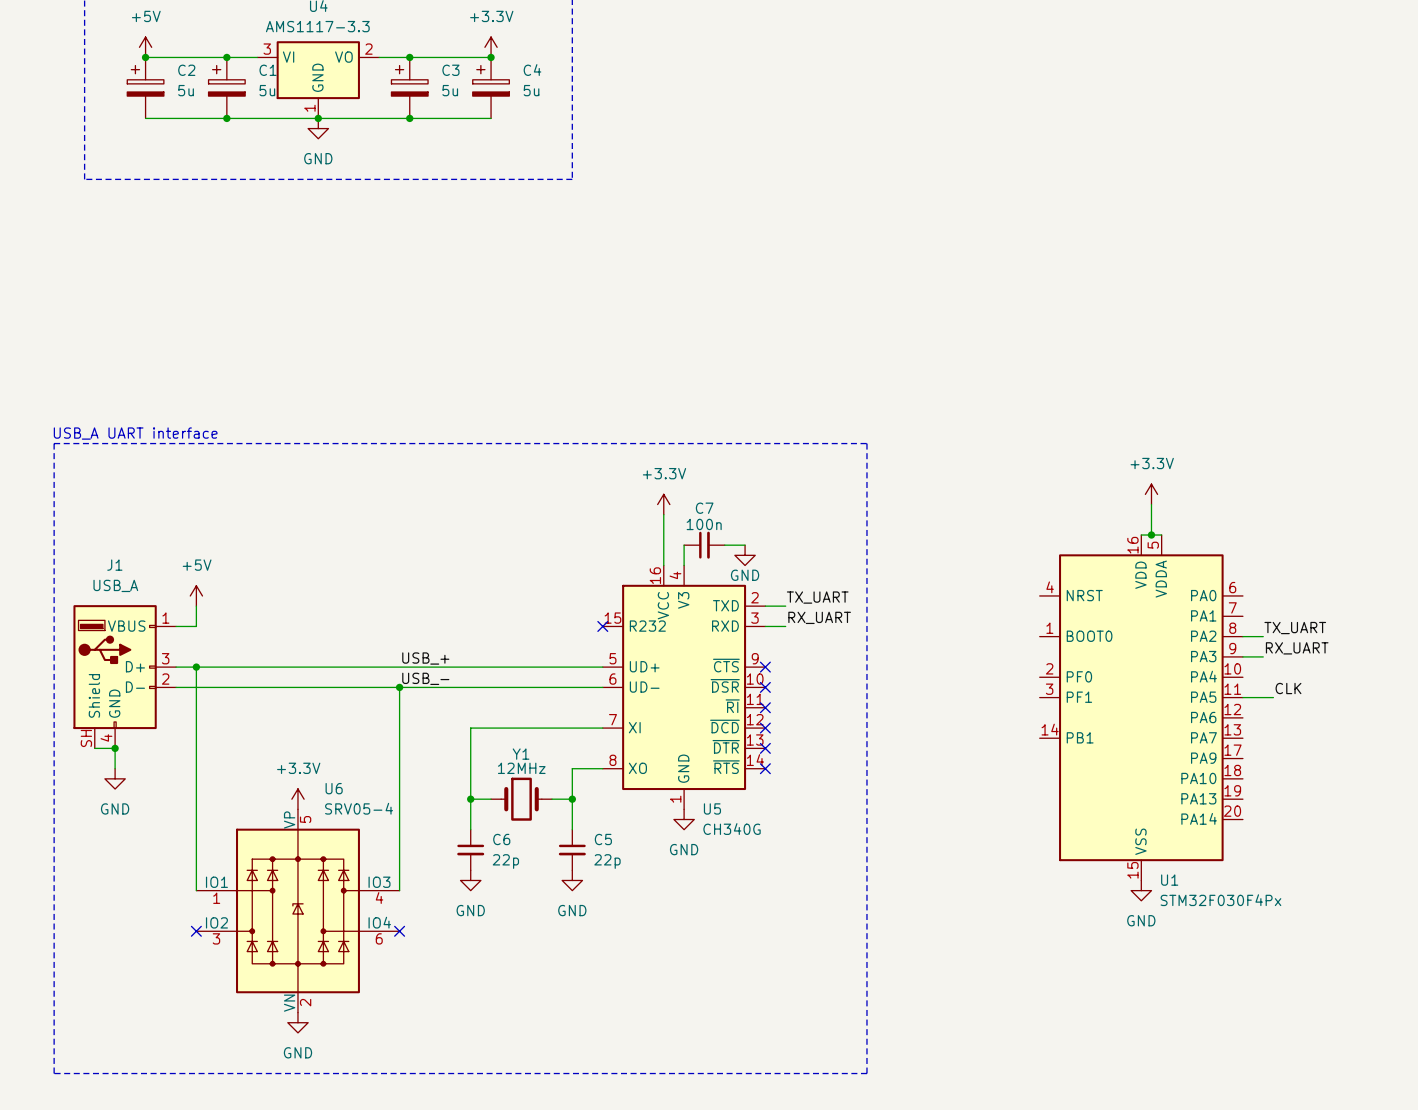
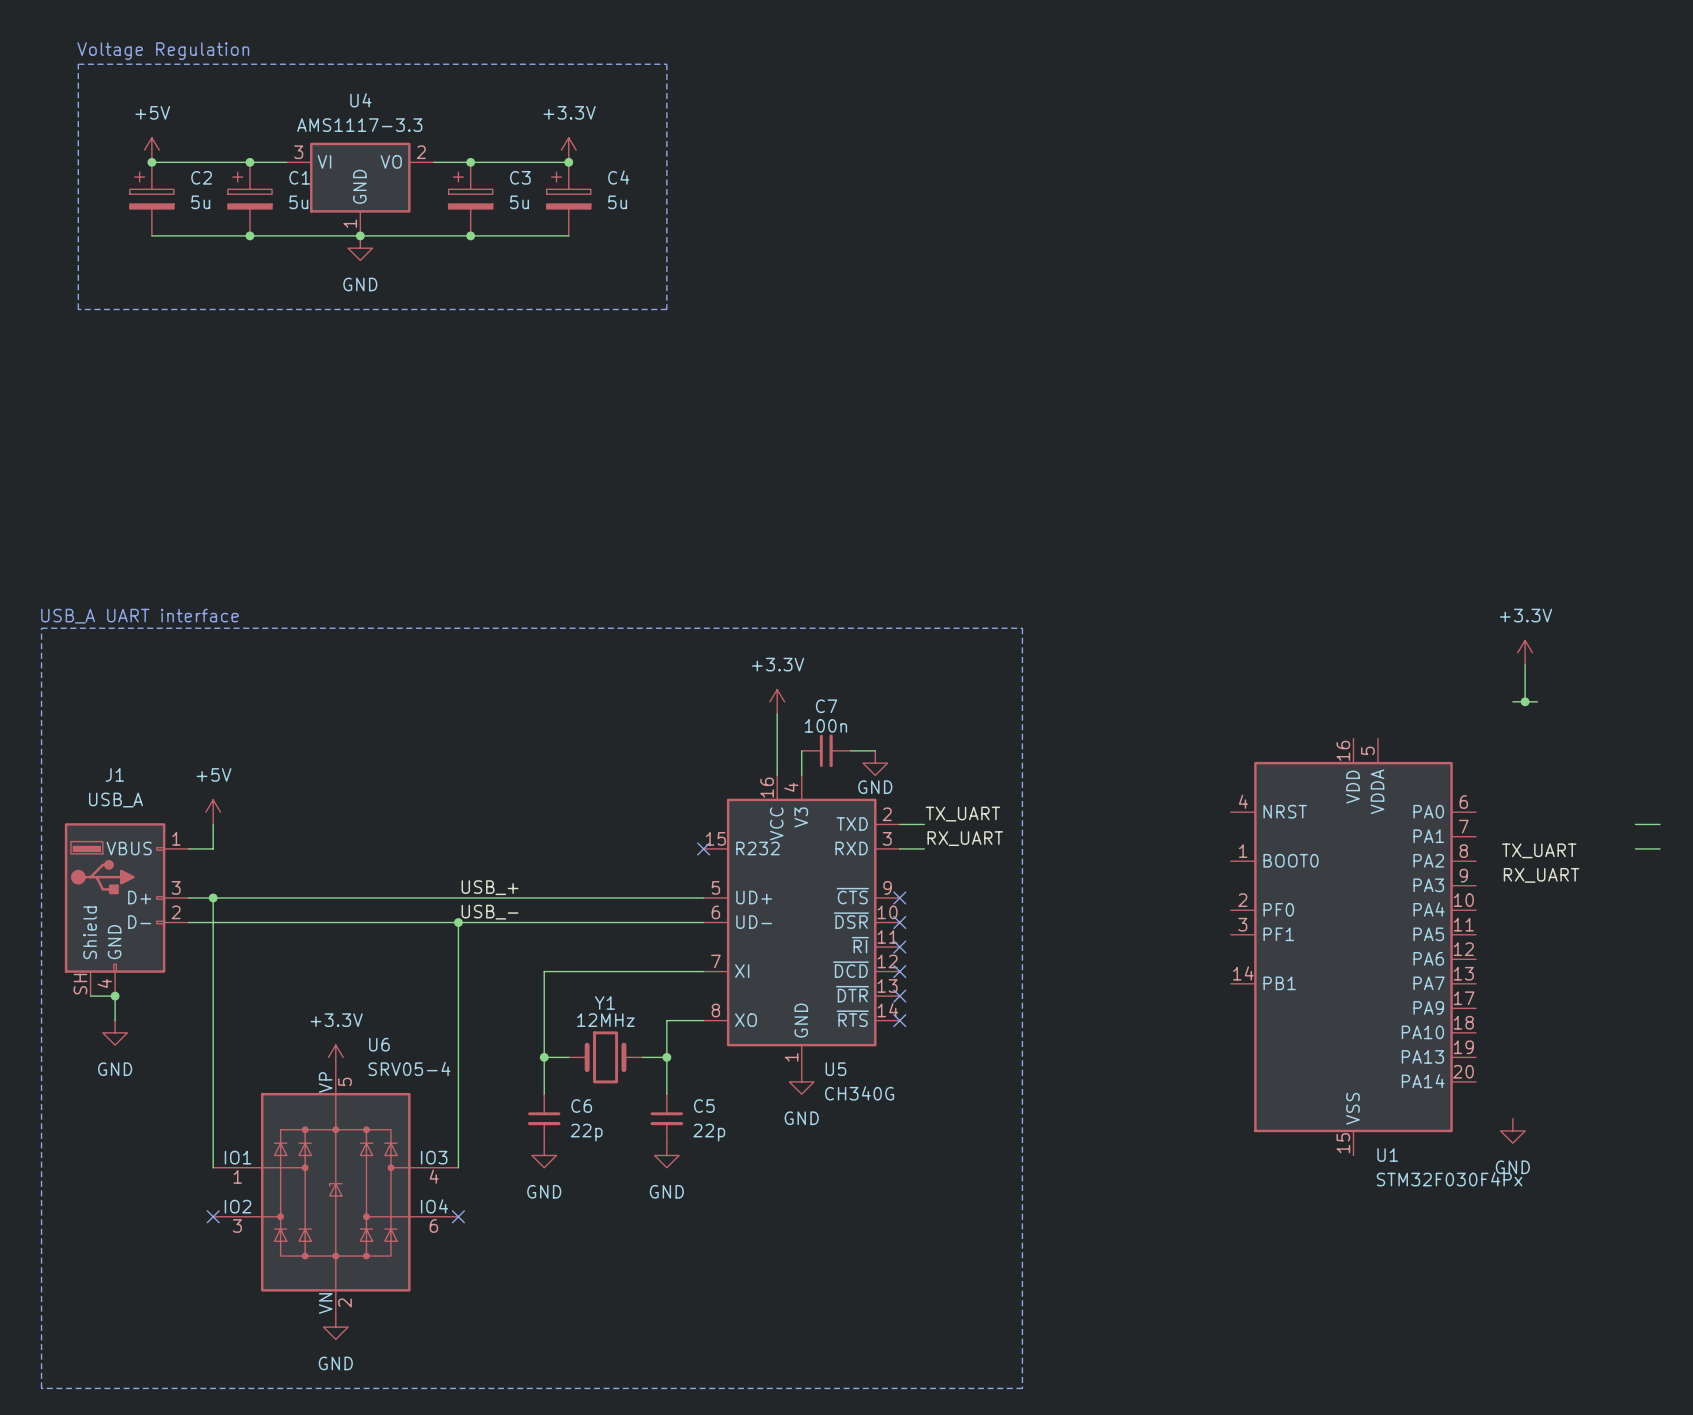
power symbol position: +3.3V (1151, 494) -> +3.3V (1525, 652)
wire: (1151, 504) (1151, 535) -> (1525, 665) (1525, 701)
junction: none -> (1525, 701)
wire: (1141, 535) (1161, 535) -> (1512, 701) (1537, 701)
junction: (1151, 535) -> none
wire: (1242, 636) (1263, 636) -> (1635, 824) (1659, 824)
wire: (1242, 656) (1263, 656) -> (1635, 848) (1659, 848)
label: CLK (1288, 688) -> none
wire: (1242, 697) (1273, 697) -> none
power symbol position: GND (1141, 890) -> GND (1512, 1130)

